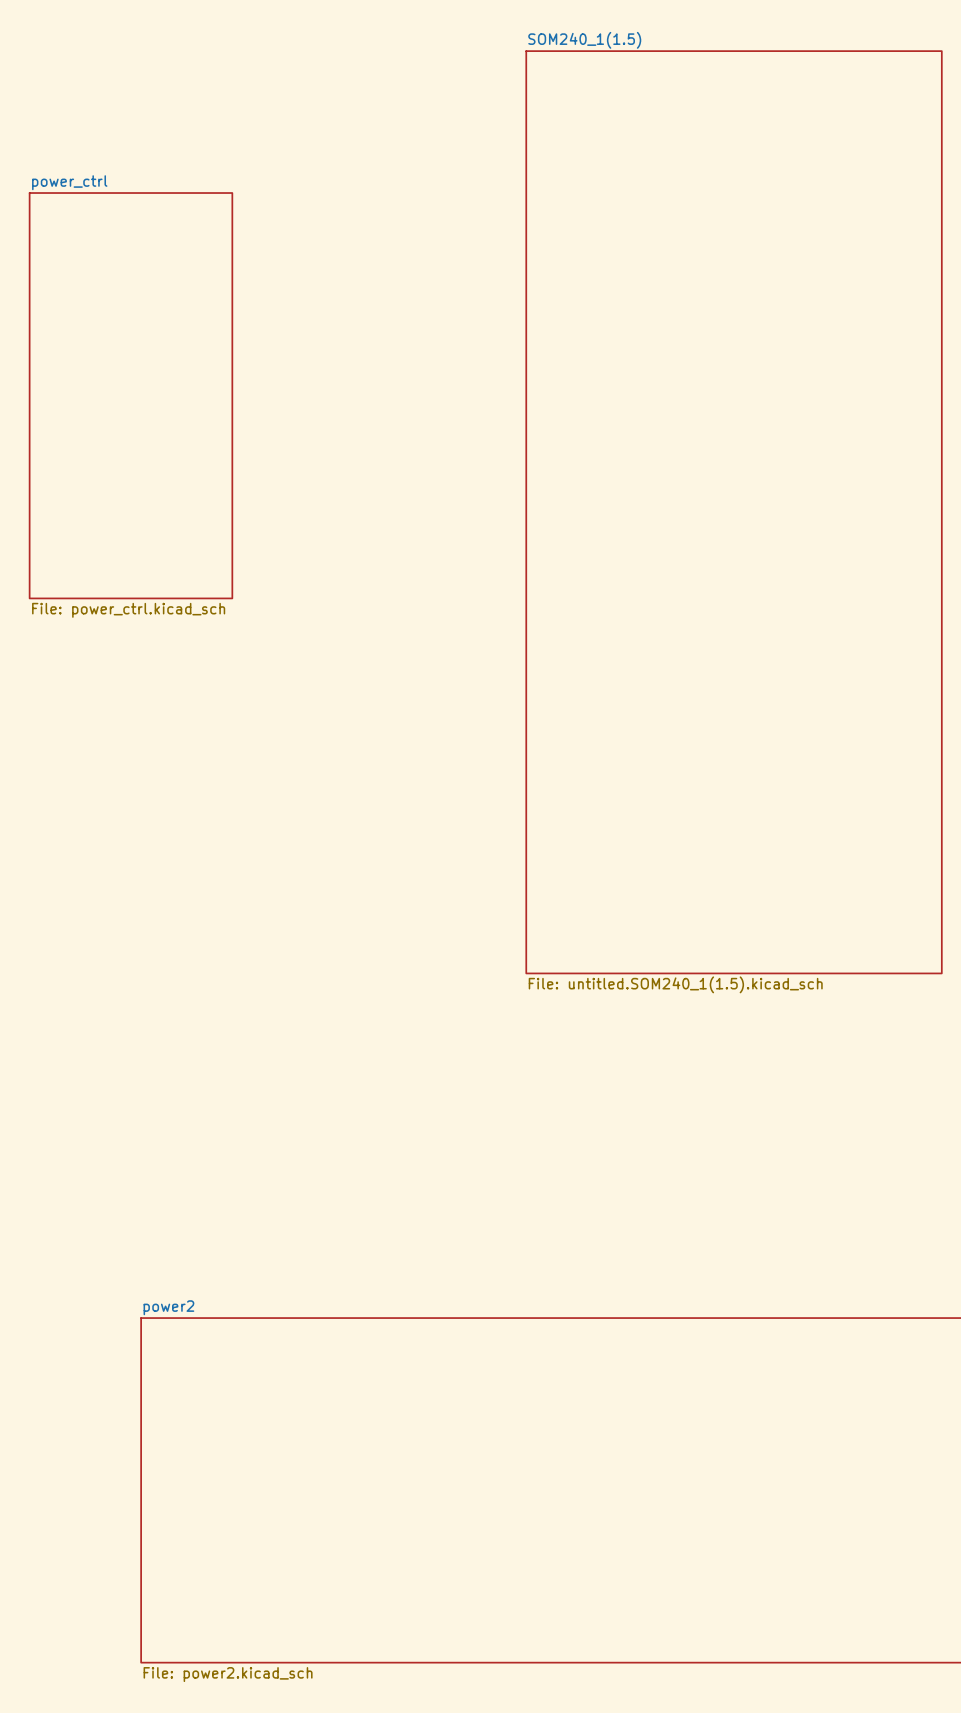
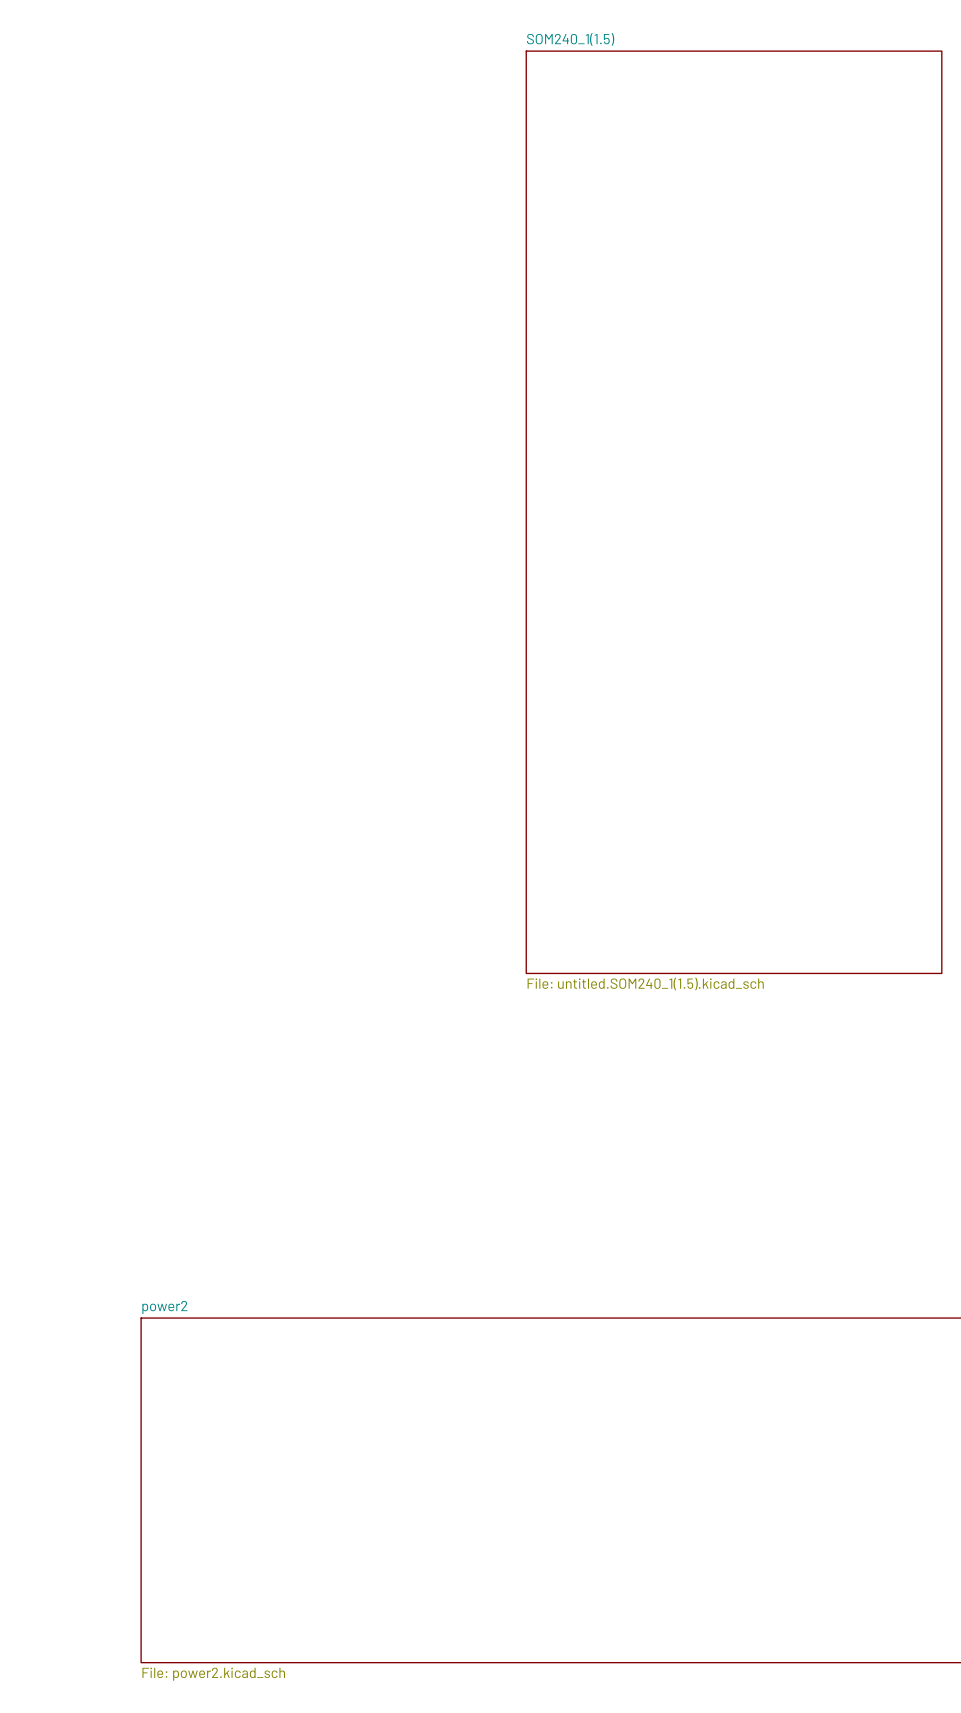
sheet power_ctrl: File: power_ctrl.kicad_sch (130, 395) -> none

